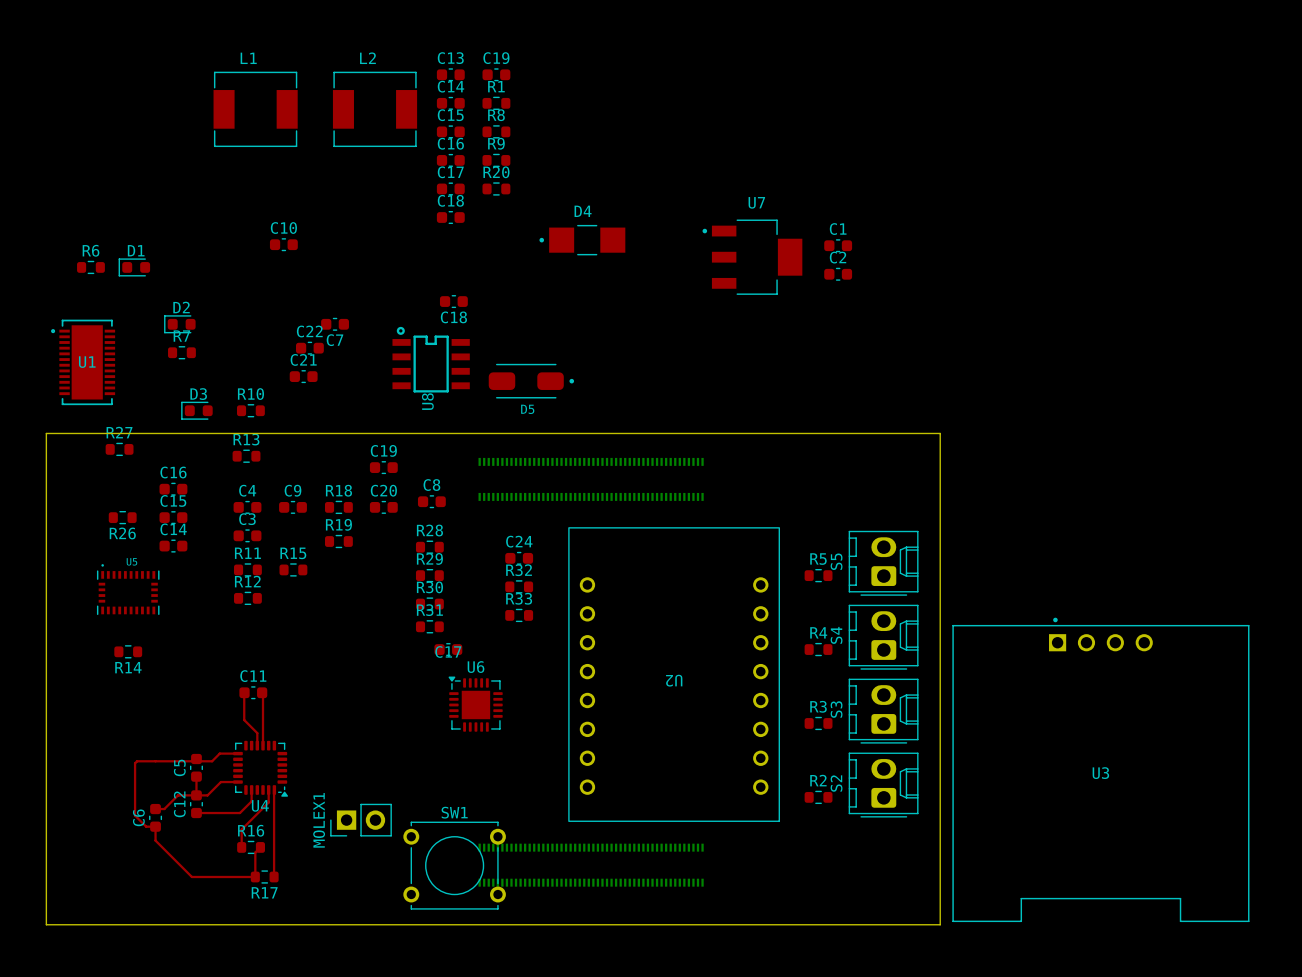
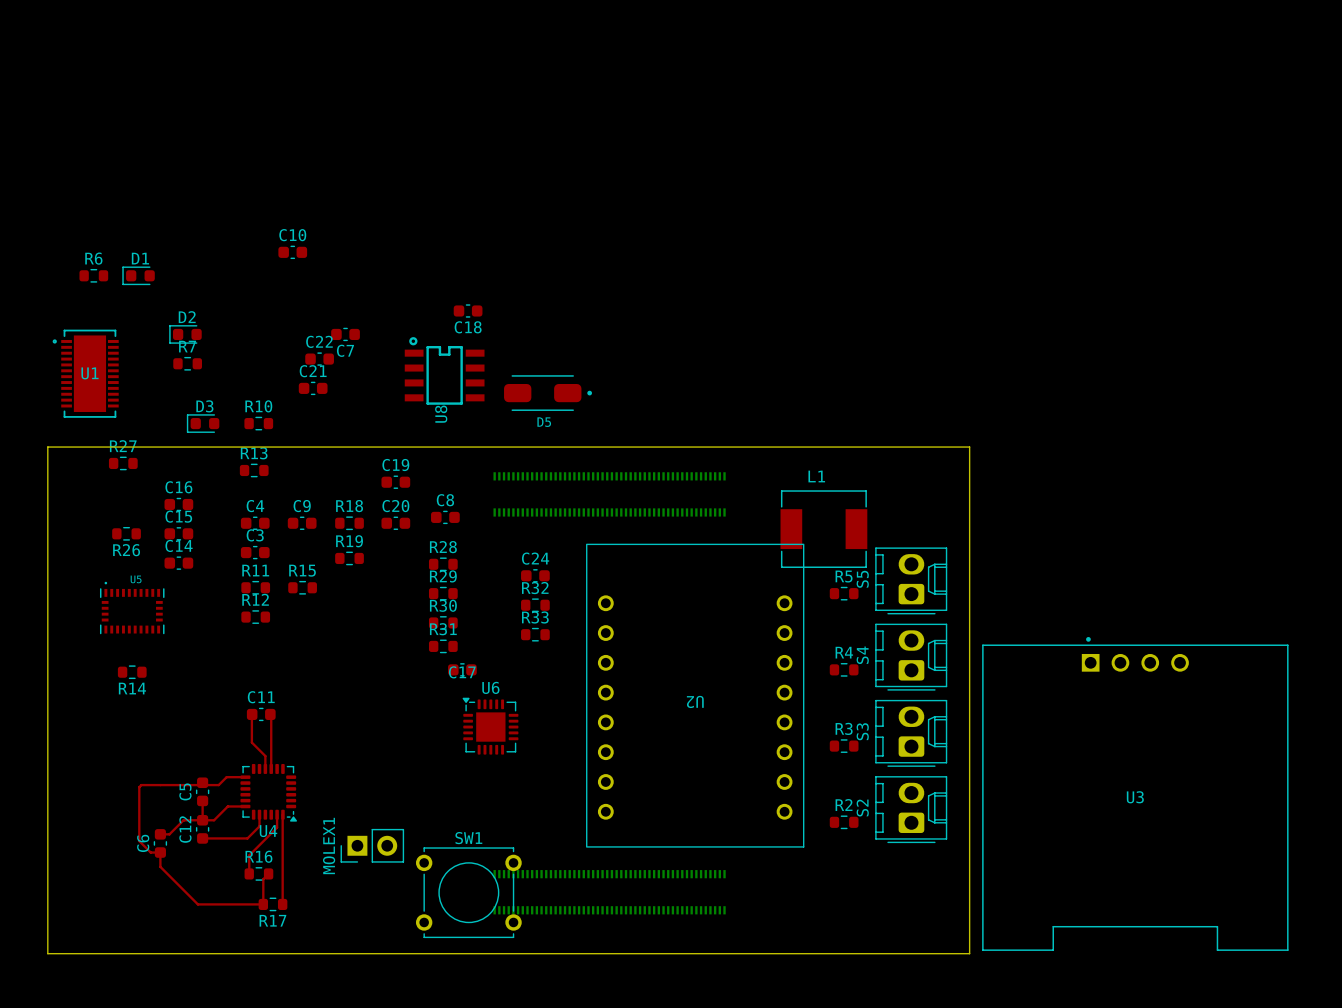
C13: (450, 74) -> none
C19: (496, 74) -> none
C14: (450, 103) -> none
R1: (496, 103) -> none
L1 position: (255, 109) -> (823, 529)
L2: (375, 109) -> none
C15: (450, 131) -> none
R8: (496, 131) -> none
C16: (450, 160) -> none
R9: (496, 160) -> none
C17: (450, 188) -> none
R20: (496, 188) -> none
C18: (450, 217) -> none
D4: (582, 240) -> none
C1: (838, 245) -> none
U7: (752, 257) -> none
C2: (838, 274) -> none

